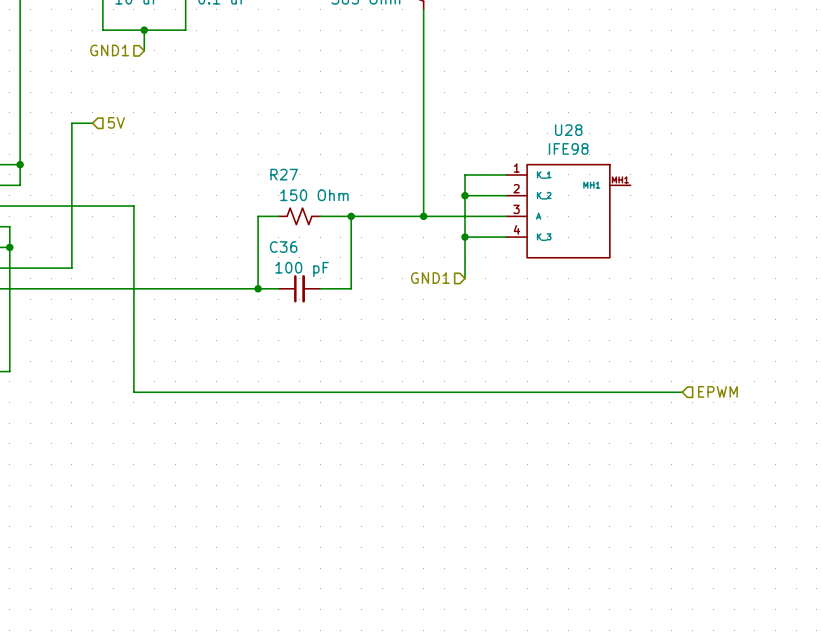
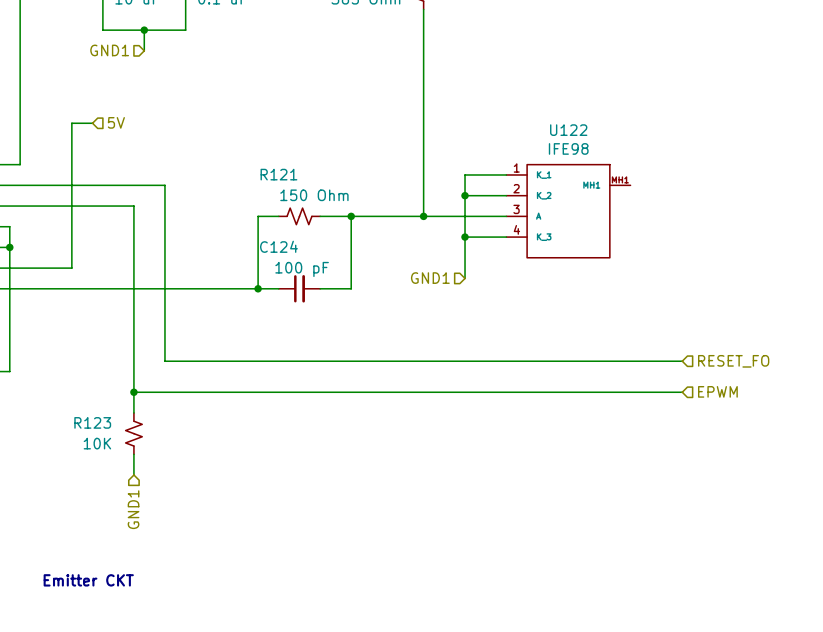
U28 name: U28 (568, 130) -> U122 (568, 130)
wire: (20, 164) (20, 185) -> (682, 361) (164, 361) (164, 185) (20, 185)
junction: (20, 164) -> none
R27 name: R27 (284, 174) -> R121 (278, 174)
C36 name: C36 (283, 247) -> C124 (278, 246)
hierarchical label: none -> RESET_FO (733, 361)
wire: none -> (133, 392) (133, 412)
junction: none -> (133, 392)
R123: none -> 10K (133, 433)
wire: none -> (133, 454) (133, 475)
hierarchical label: none -> GND1 (133, 509)
text: none -> Emitter CKT (88, 580)

